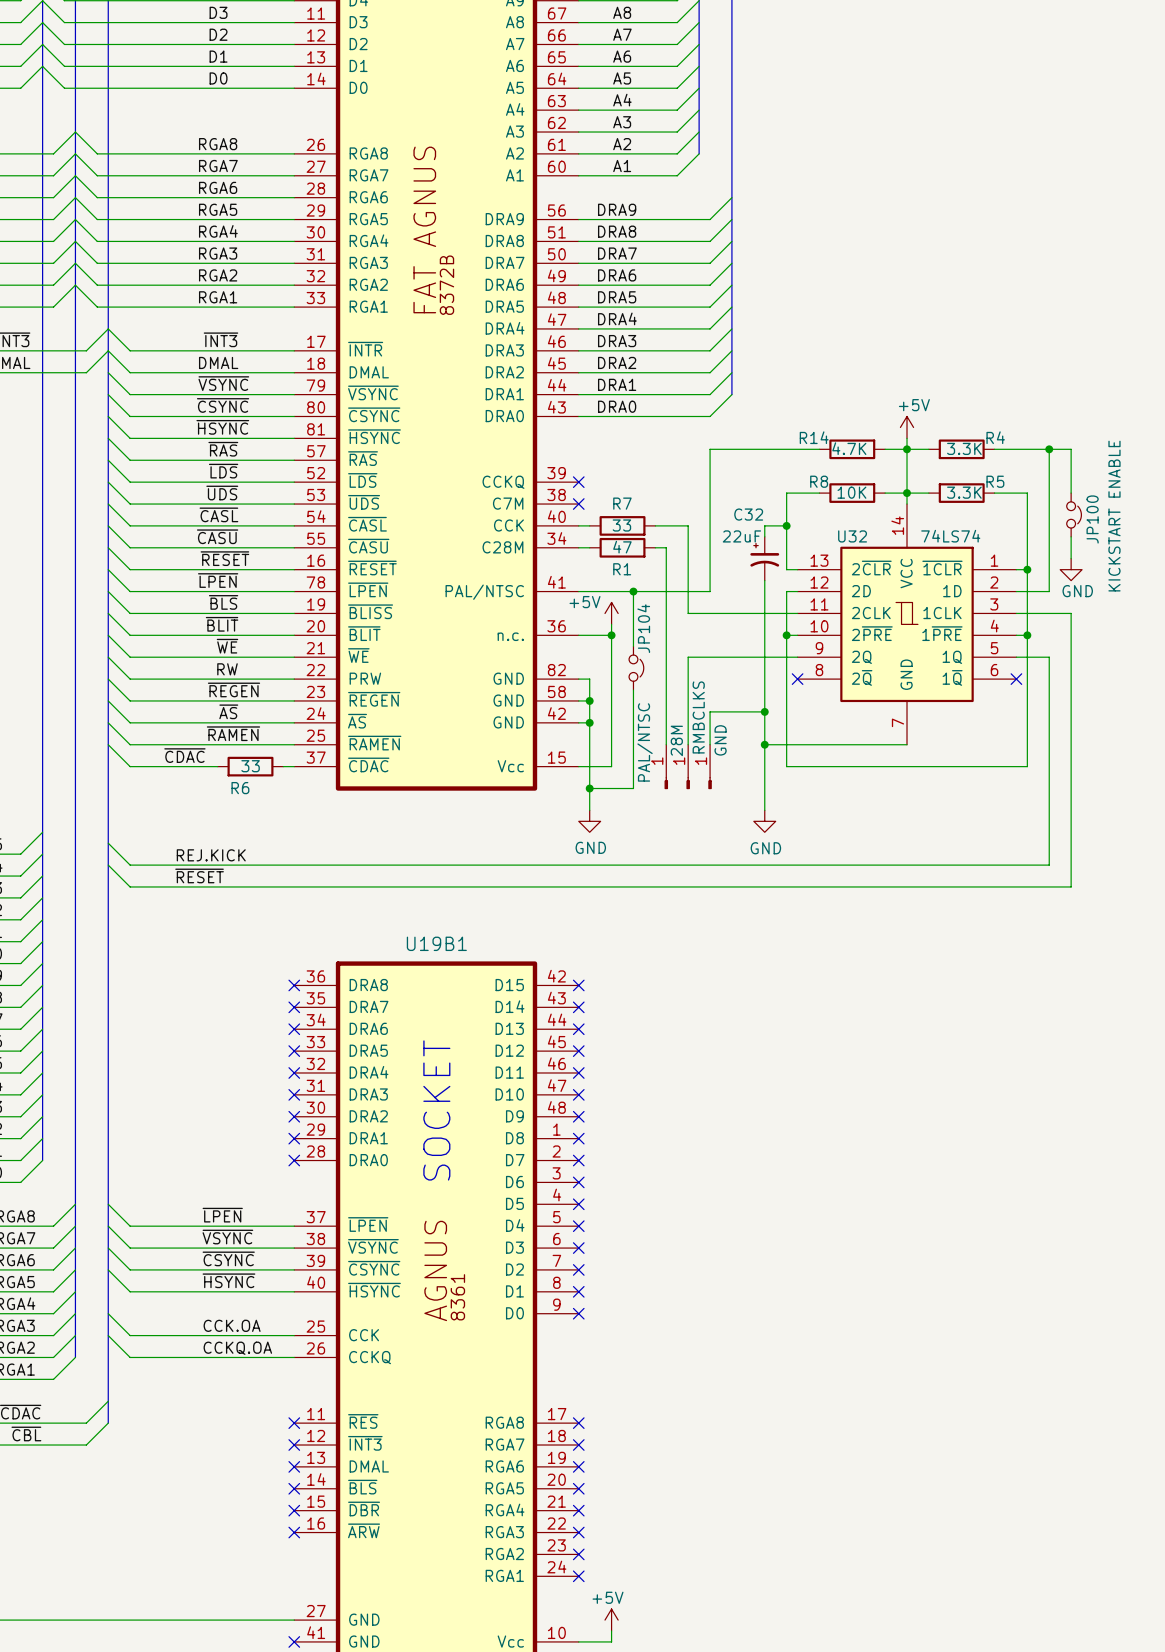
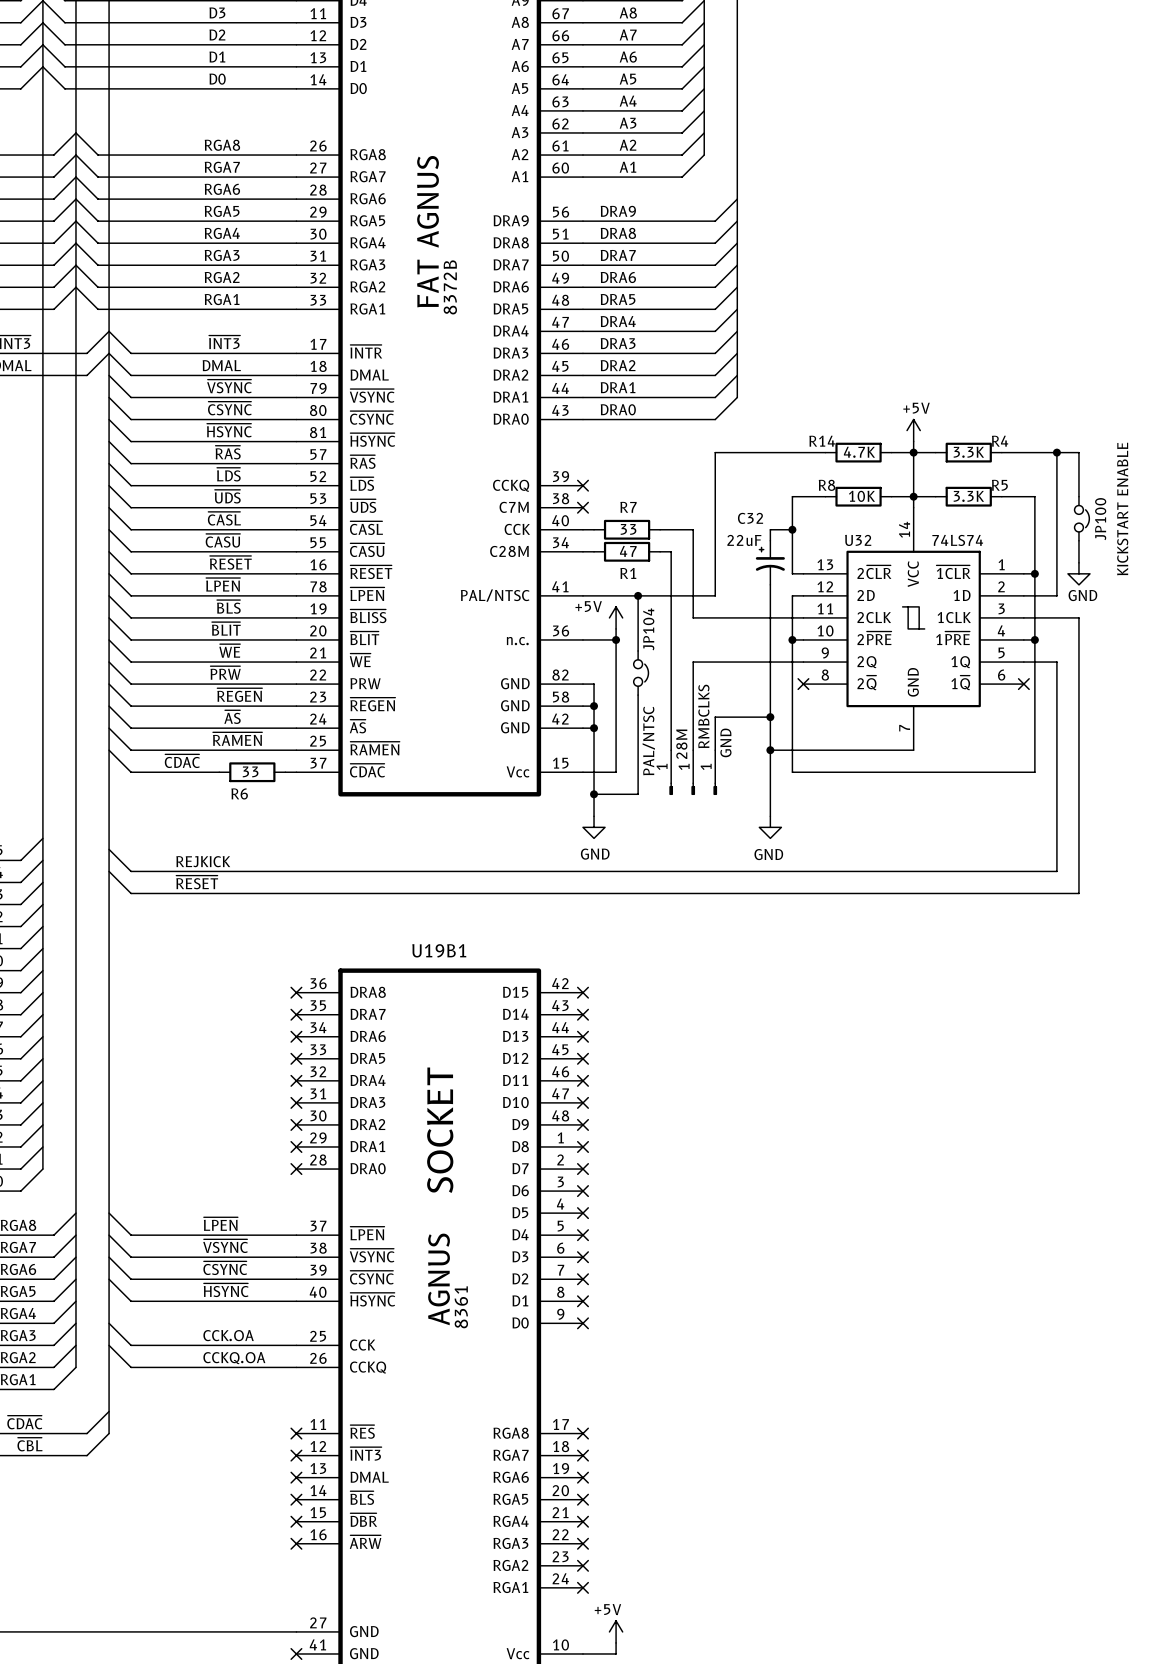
label: RW (227, 669) -> ~{PRW} (225, 672)
label: REJ.KICK (211, 855) -> REJKICK (203, 861)

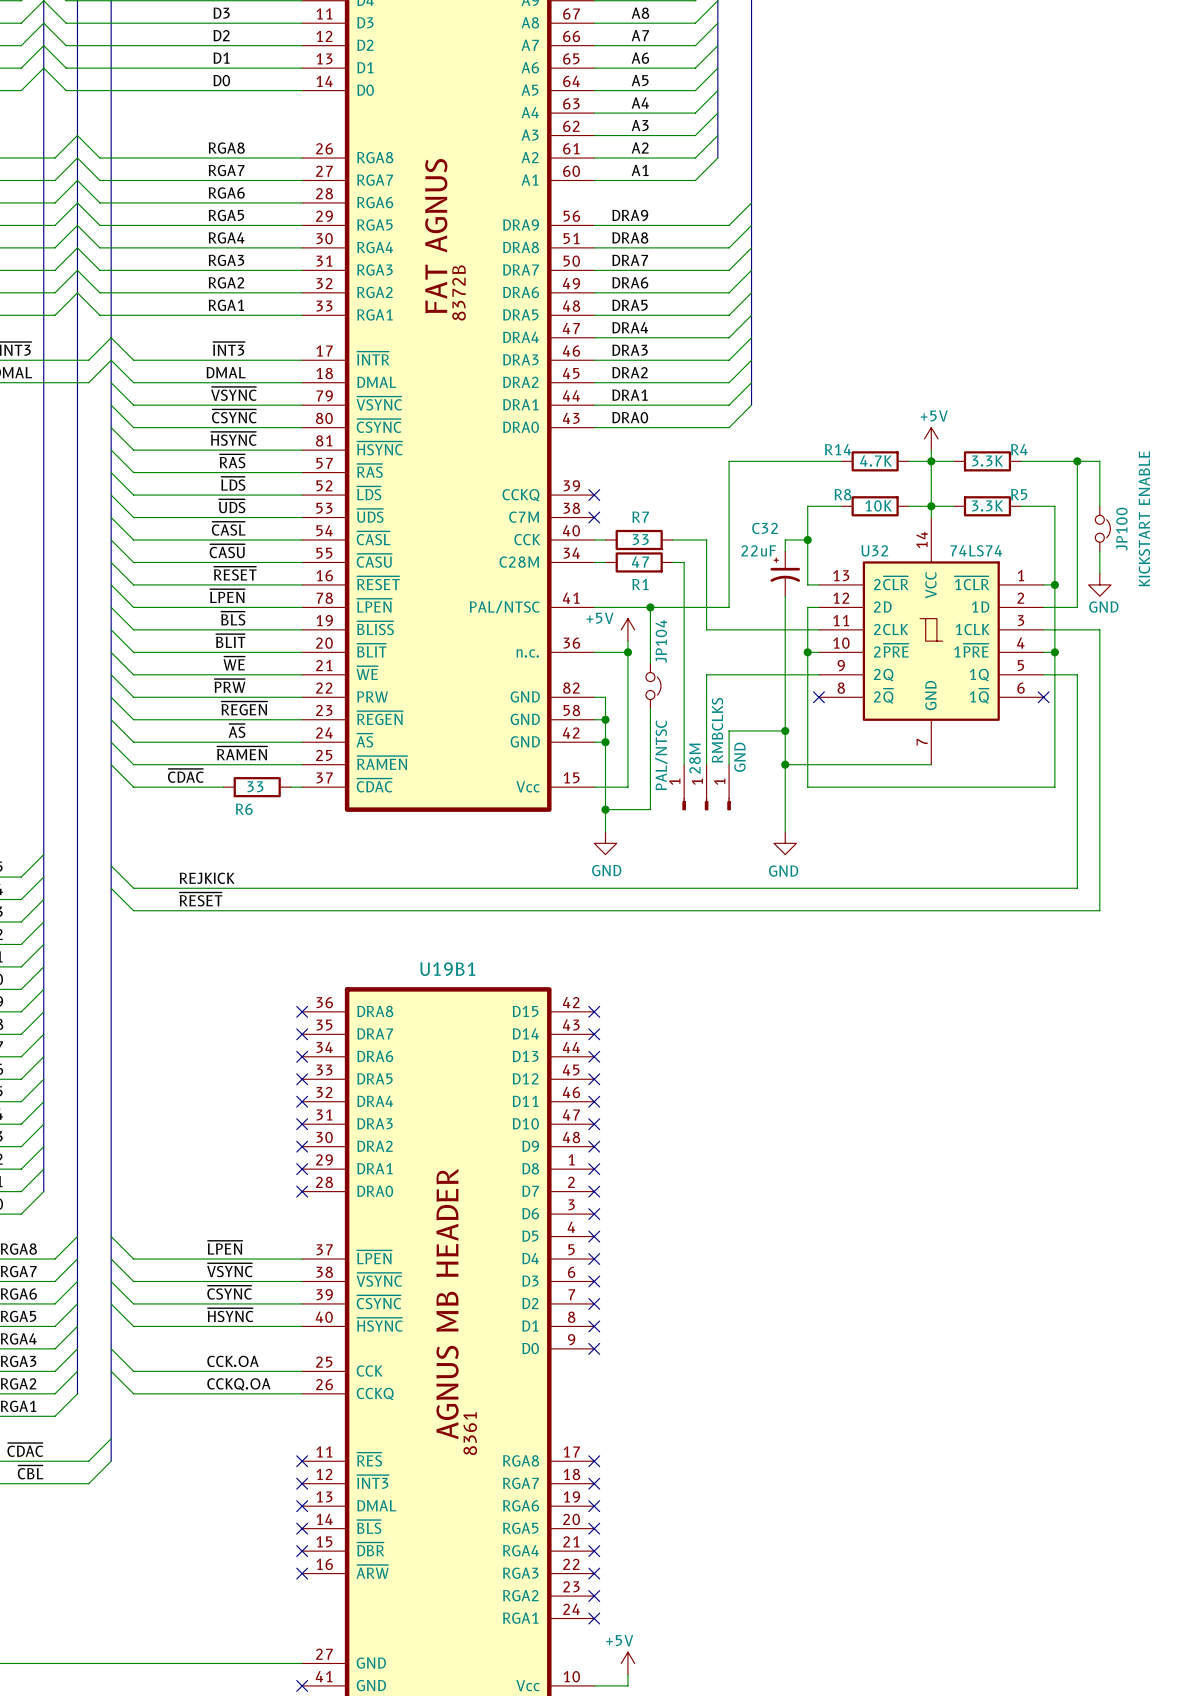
text: SOCKET (440, 1130) -> none
U19B1 text: AGNUS (439, 1279) -> AGNUS MB HEADER (447, 1303)
U19B1 text position: 8361 (461, 1307) -> 8361 (470, 1433)

